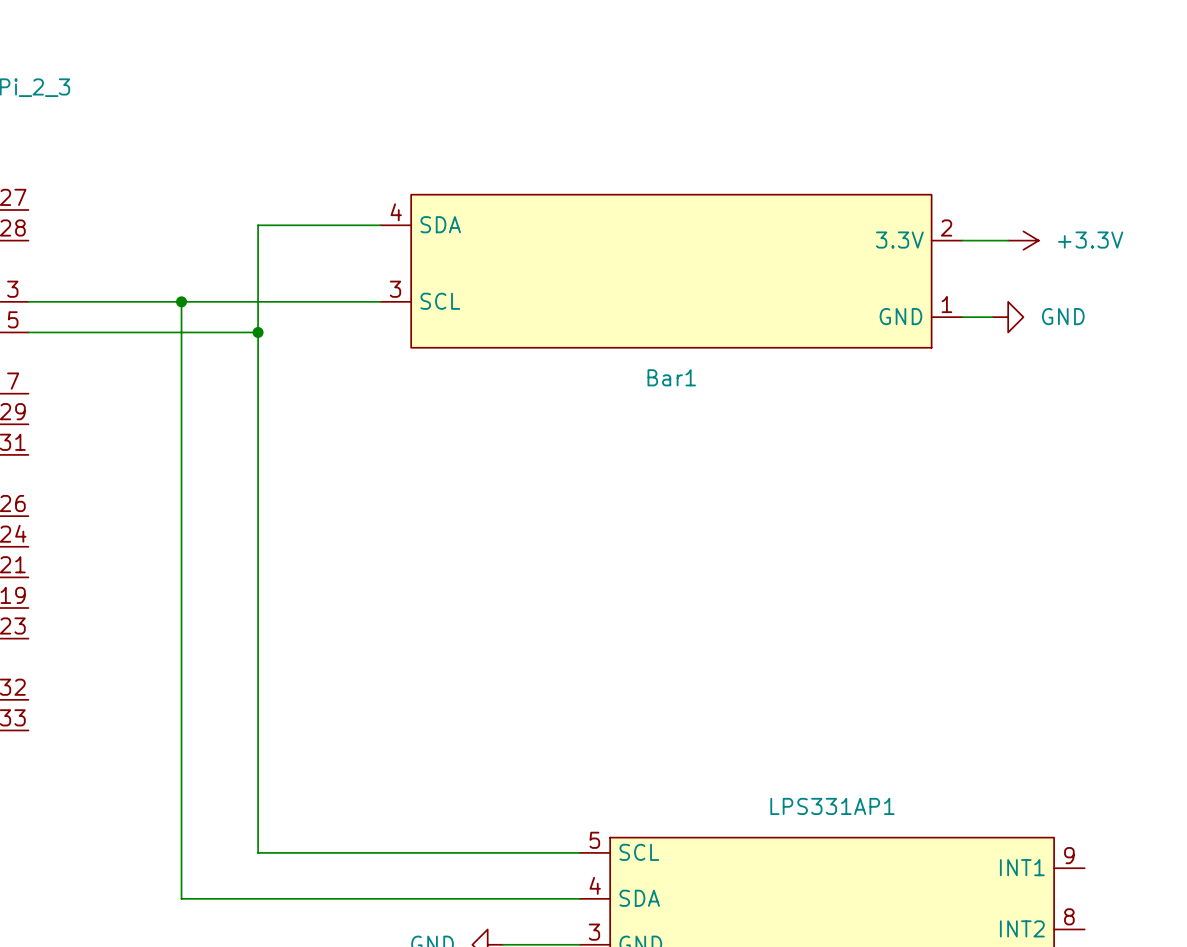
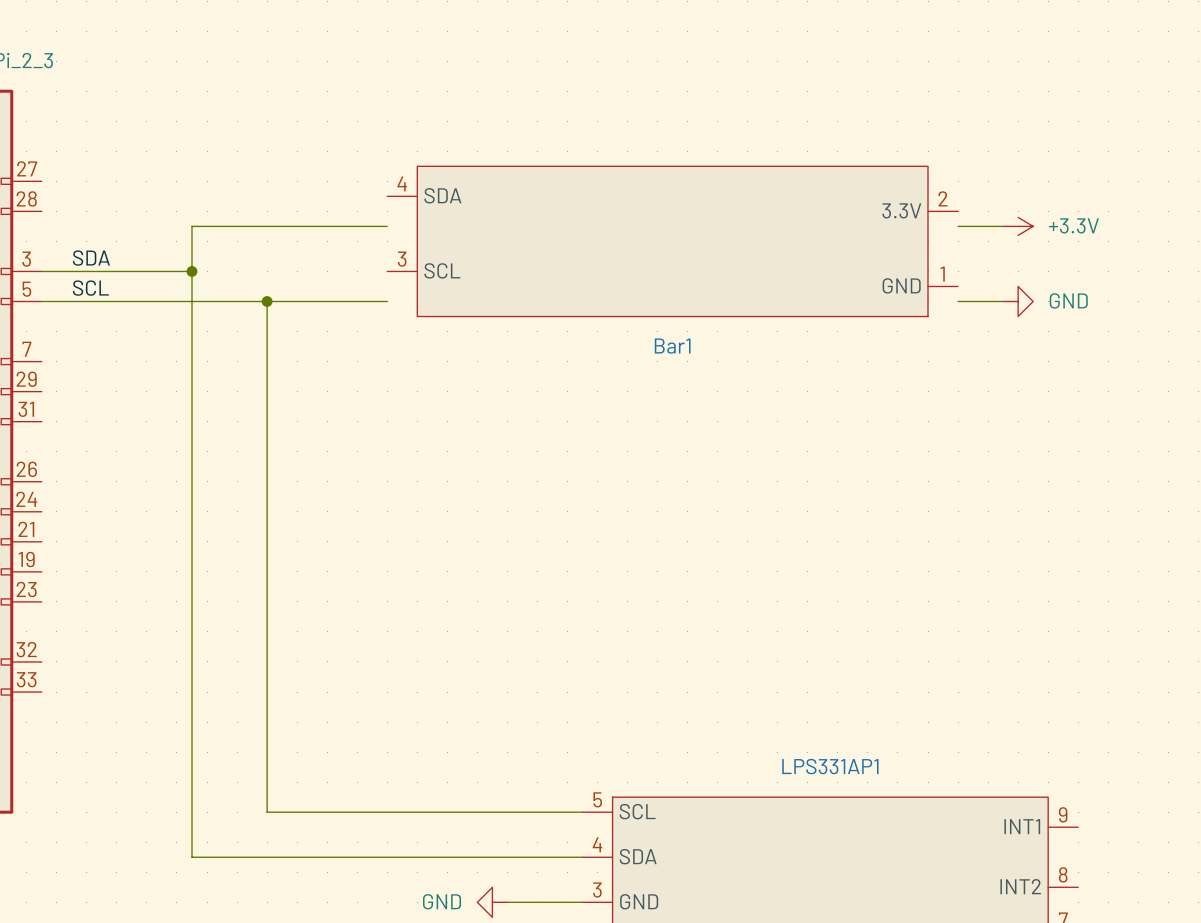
wire: (380, 225) (258, 225) (258, 332) -> (387, 301) (267, 301)
wire: (962, 240) (1008, 240) -> (958, 226) (1003, 226)
power symbol position: +3.3V (1023, 240) -> +3.3V (1018, 226)
label: none -> SDA (91, 258)
wire: (181, 301) (380, 301) -> (192, 271) (192, 226) (387, 226)
wire: (962, 317) (992, 317) -> none
power symbol position: GND (1008, 317) -> GND (1018, 301)
label: none -> SCL (90, 288)
wire: none -> (958, 301) (1003, 301)

